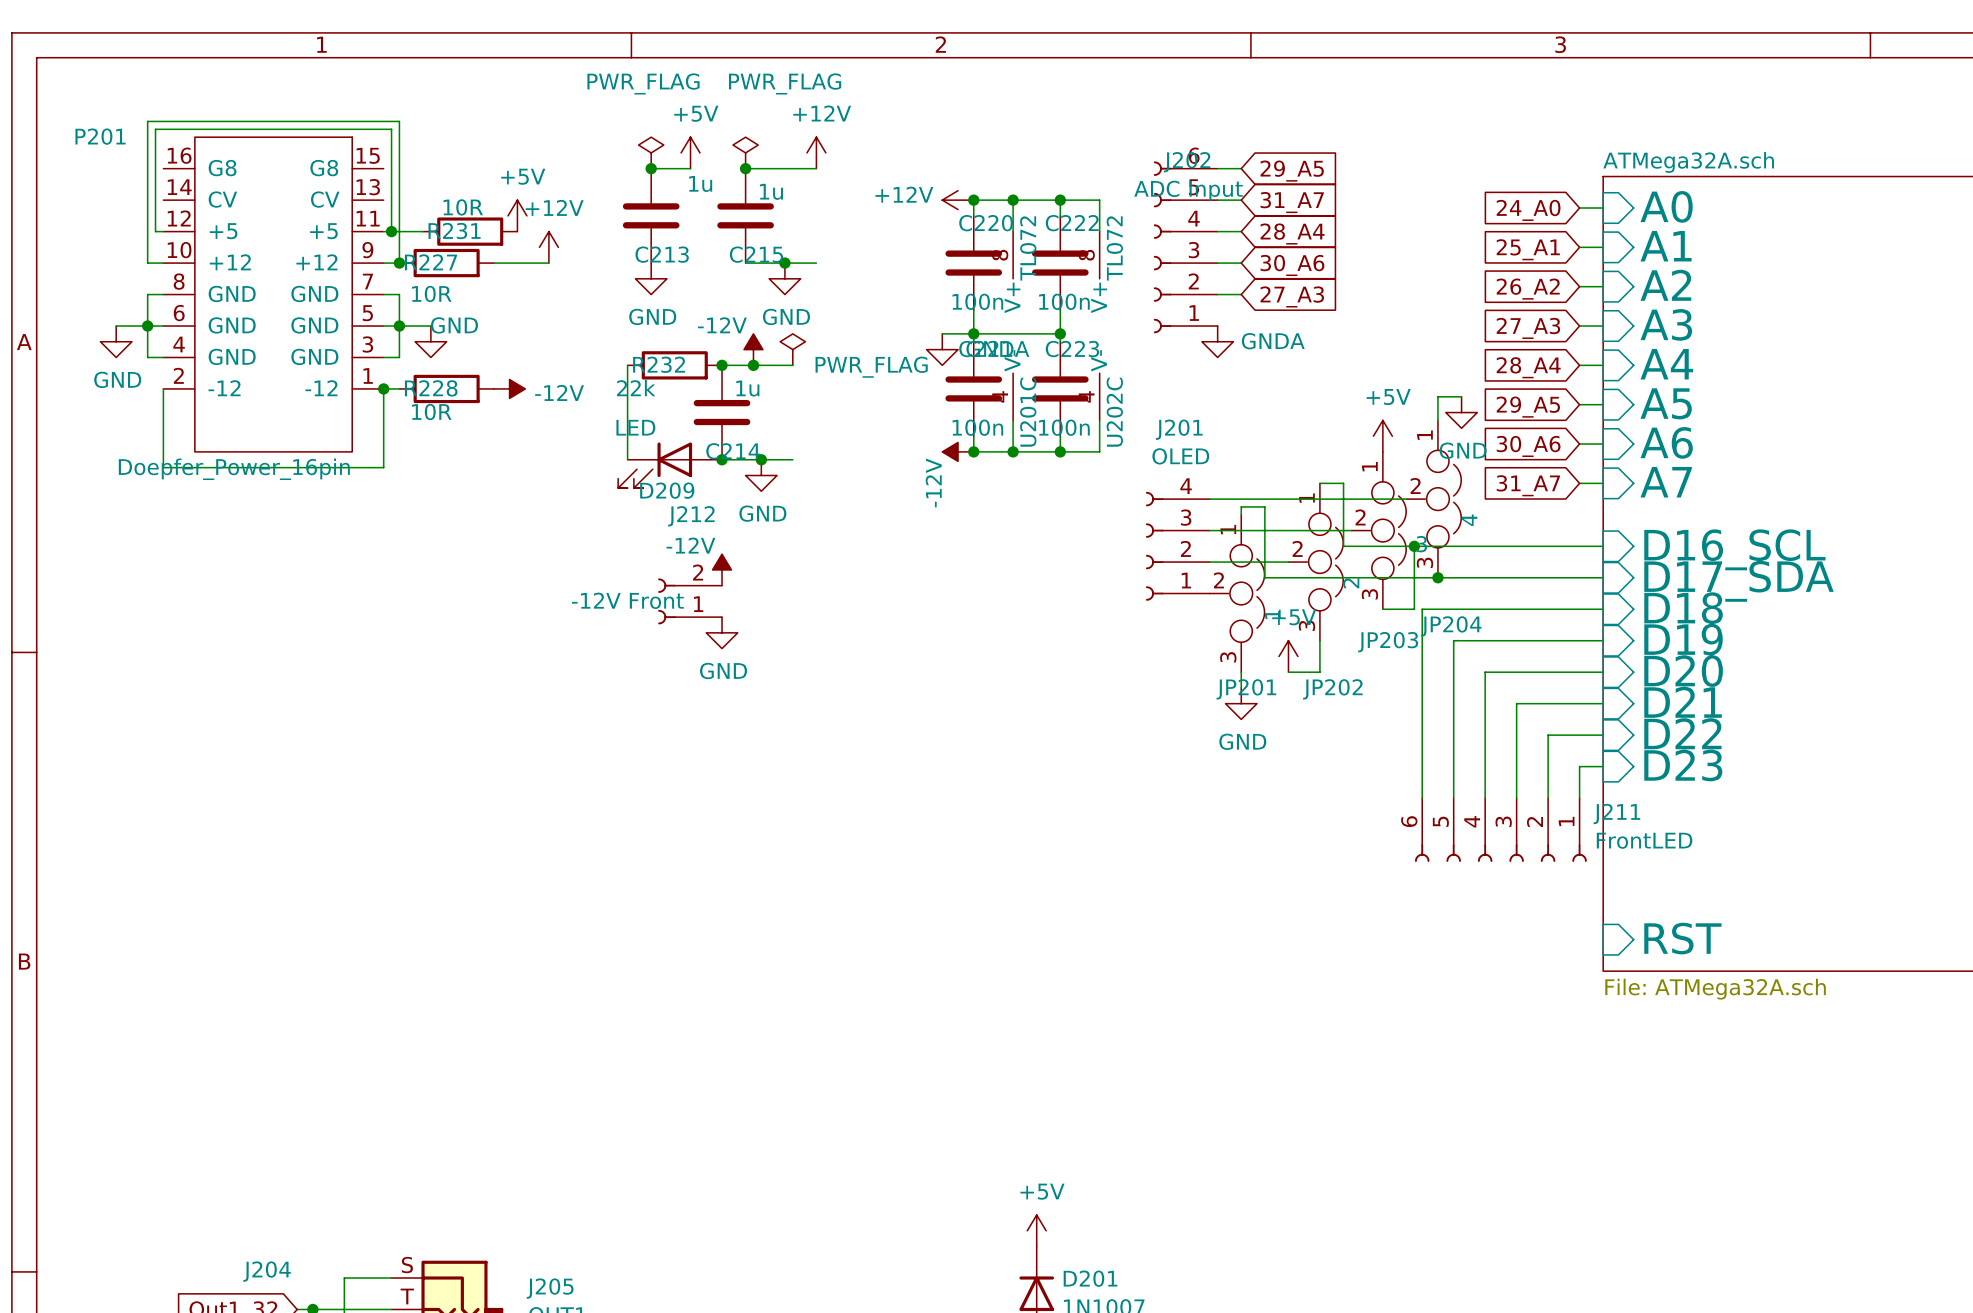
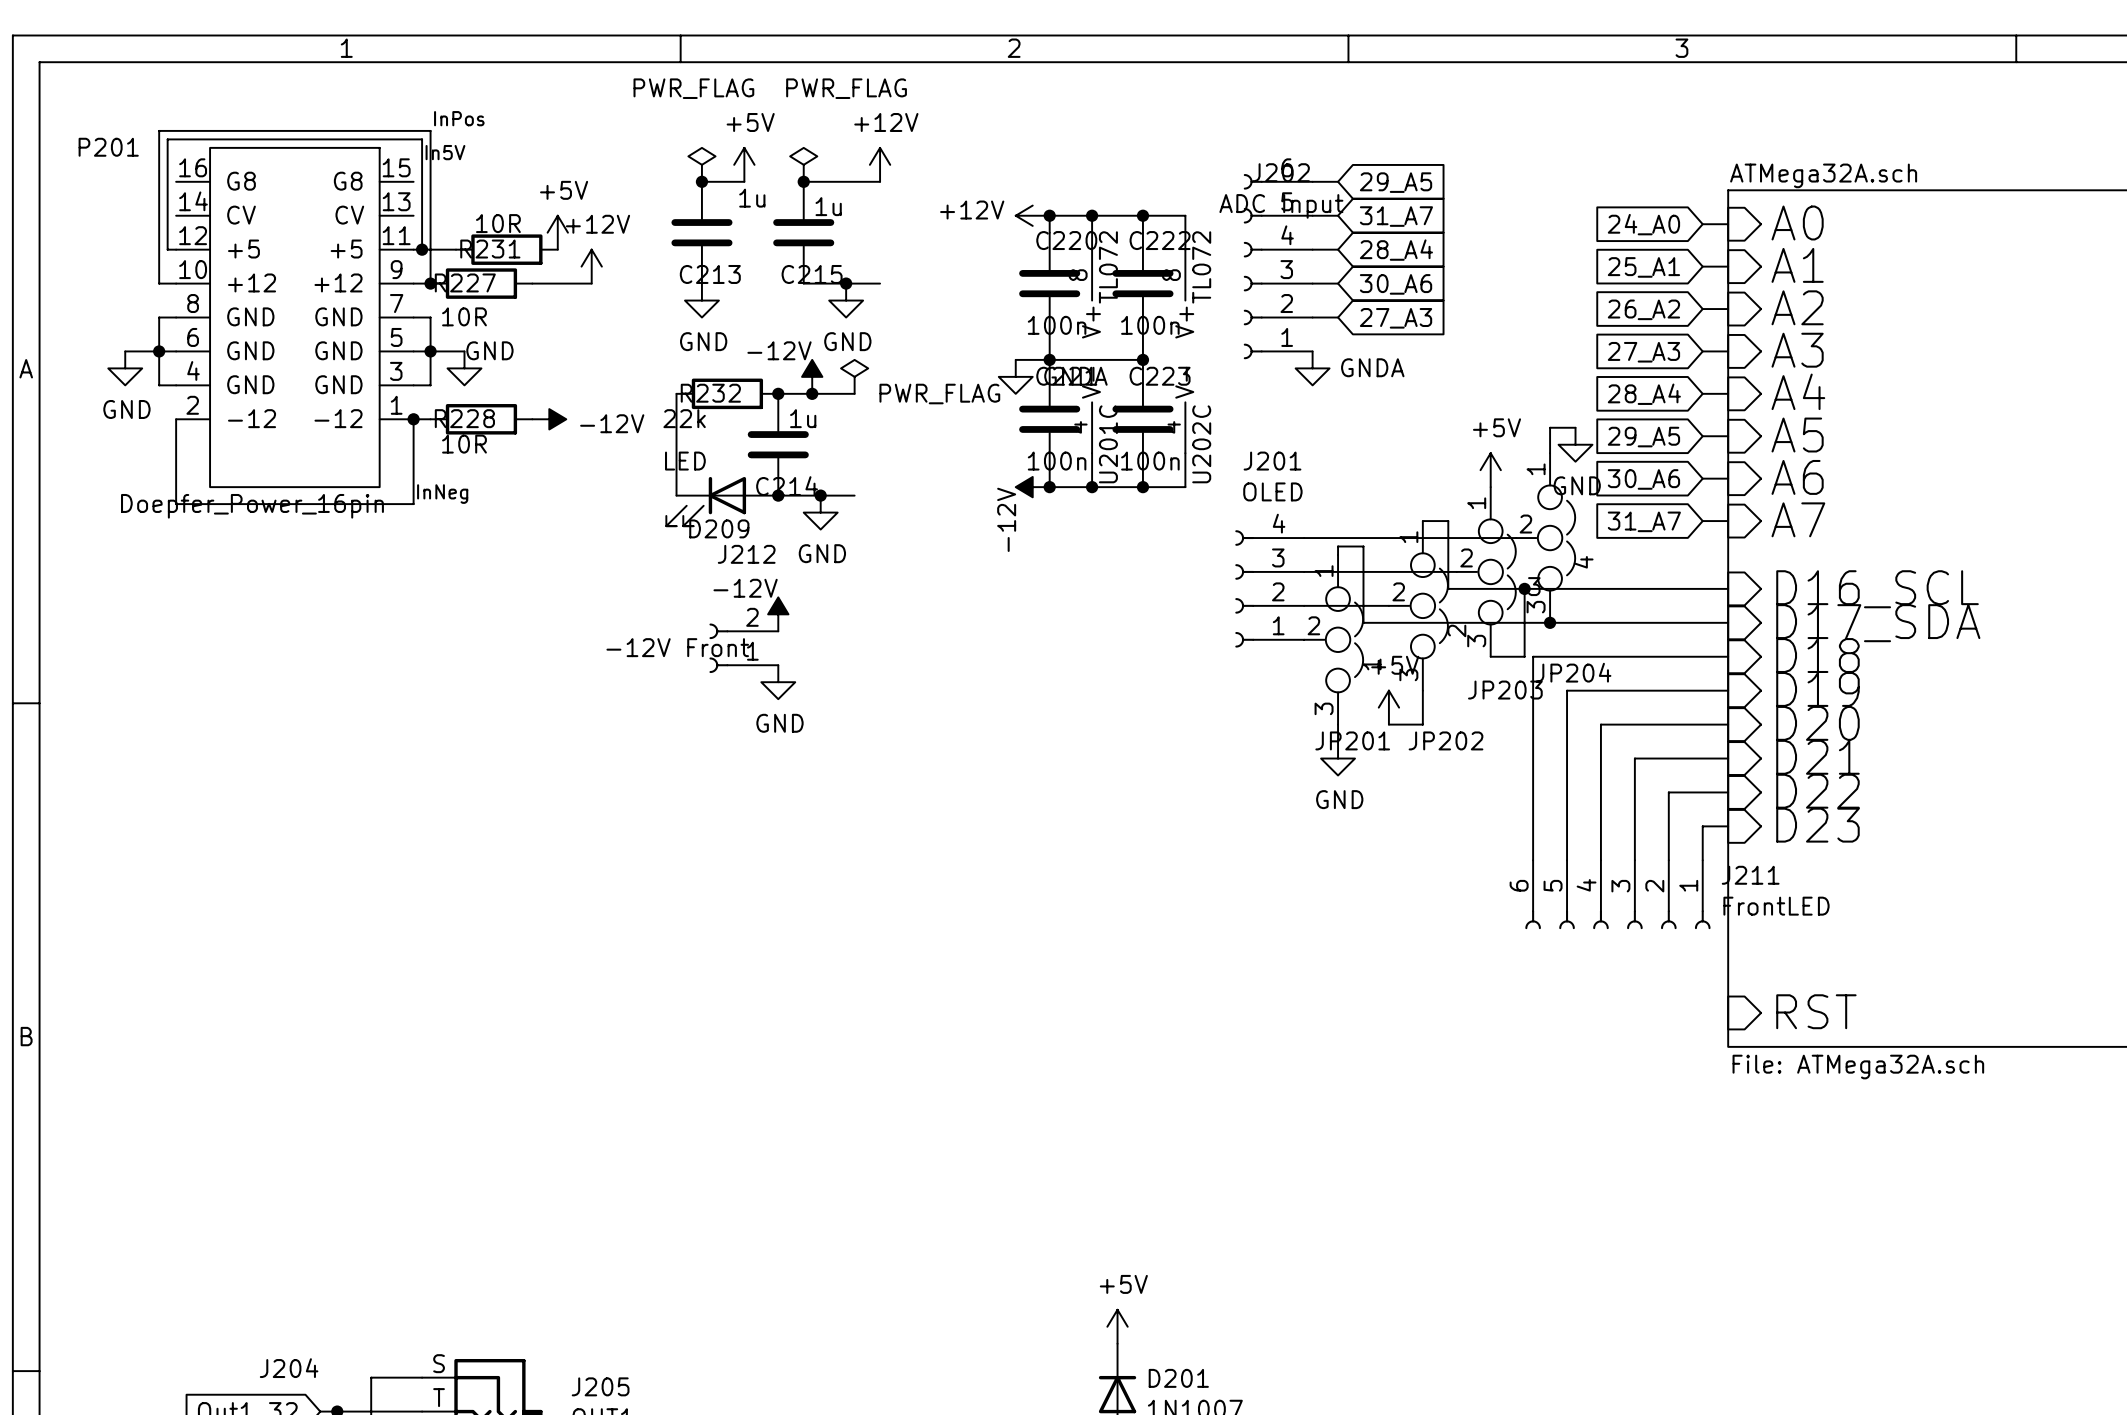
label: none -> InPos (459, 118)
label: none -> In5V (445, 152)
label: none -> InNeg (442, 494)

